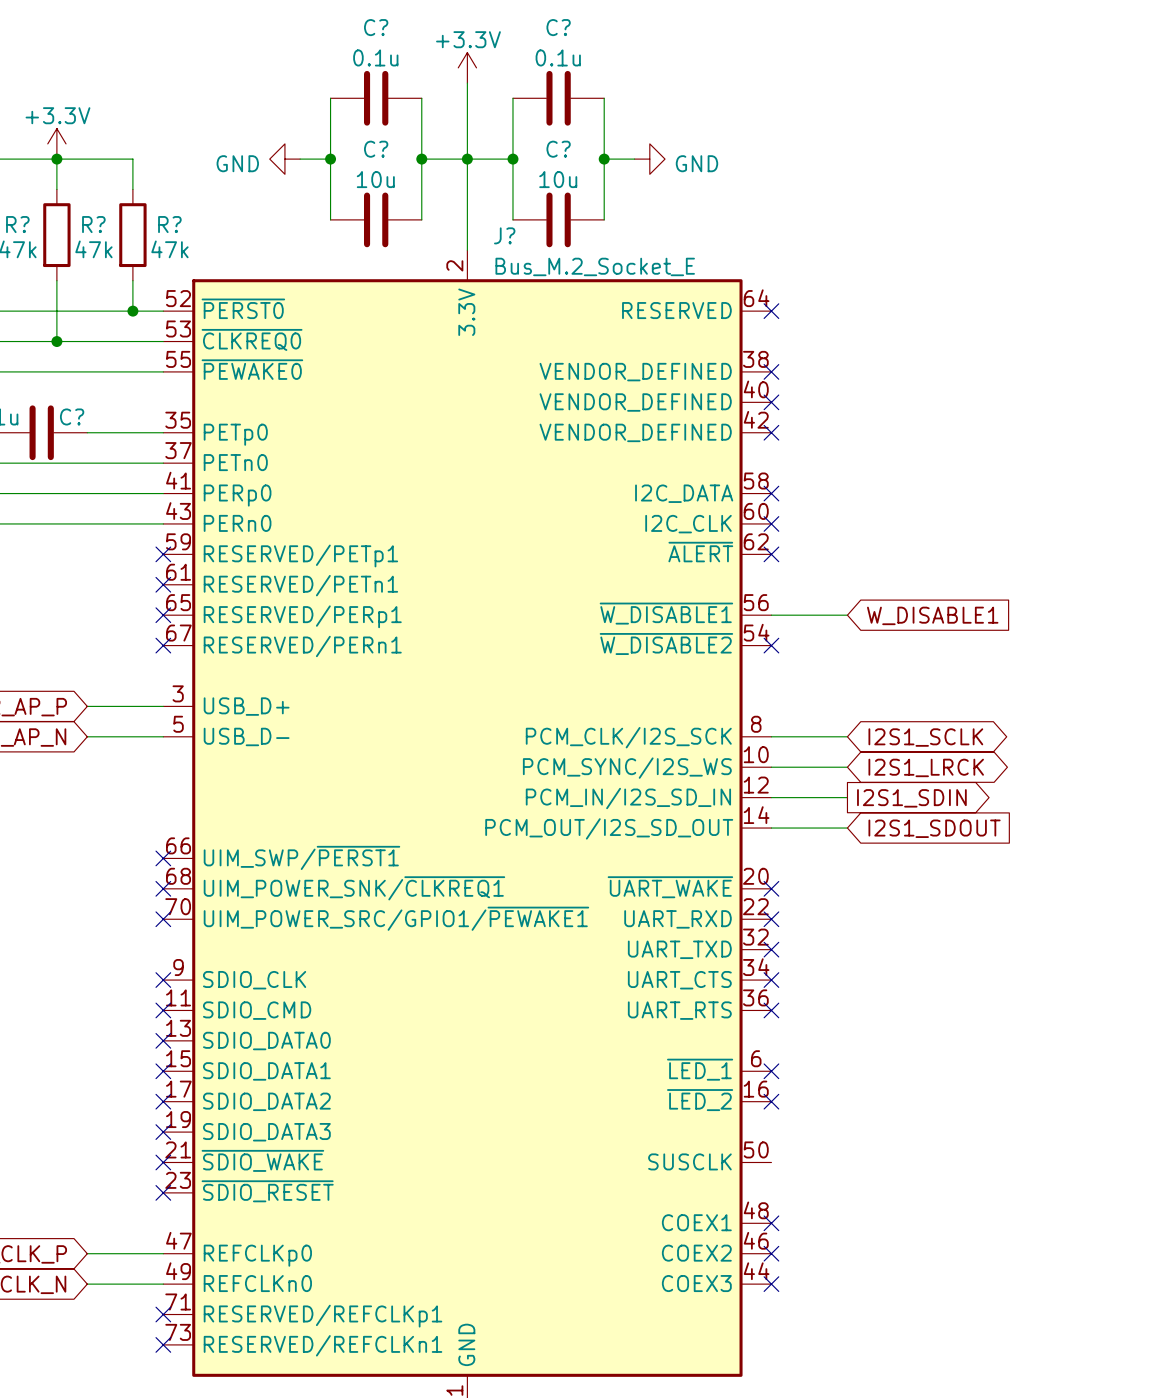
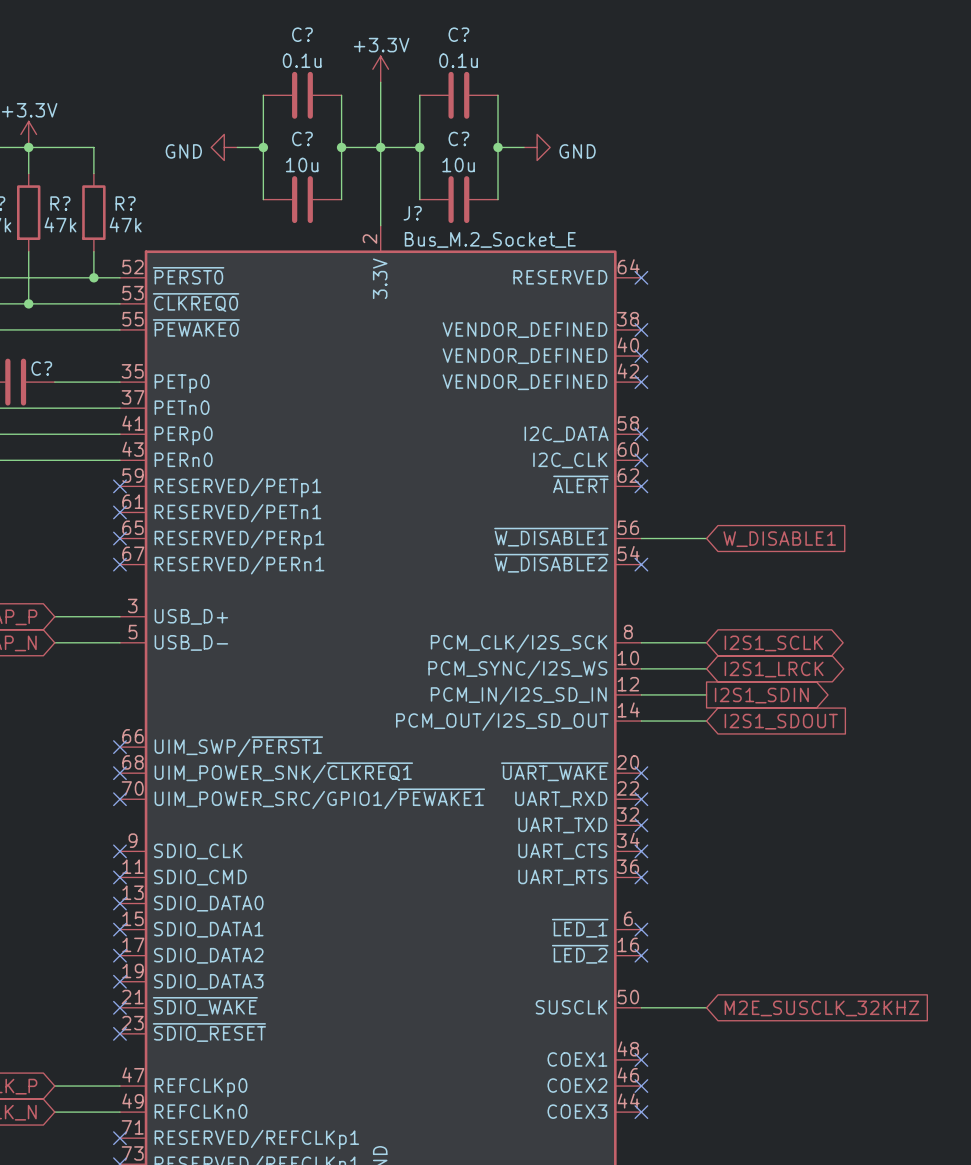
wire: none -> (641, 1007) (706, 1007)
global label: none -> M2E_SUSCLK_32KHZ (821, 1008)

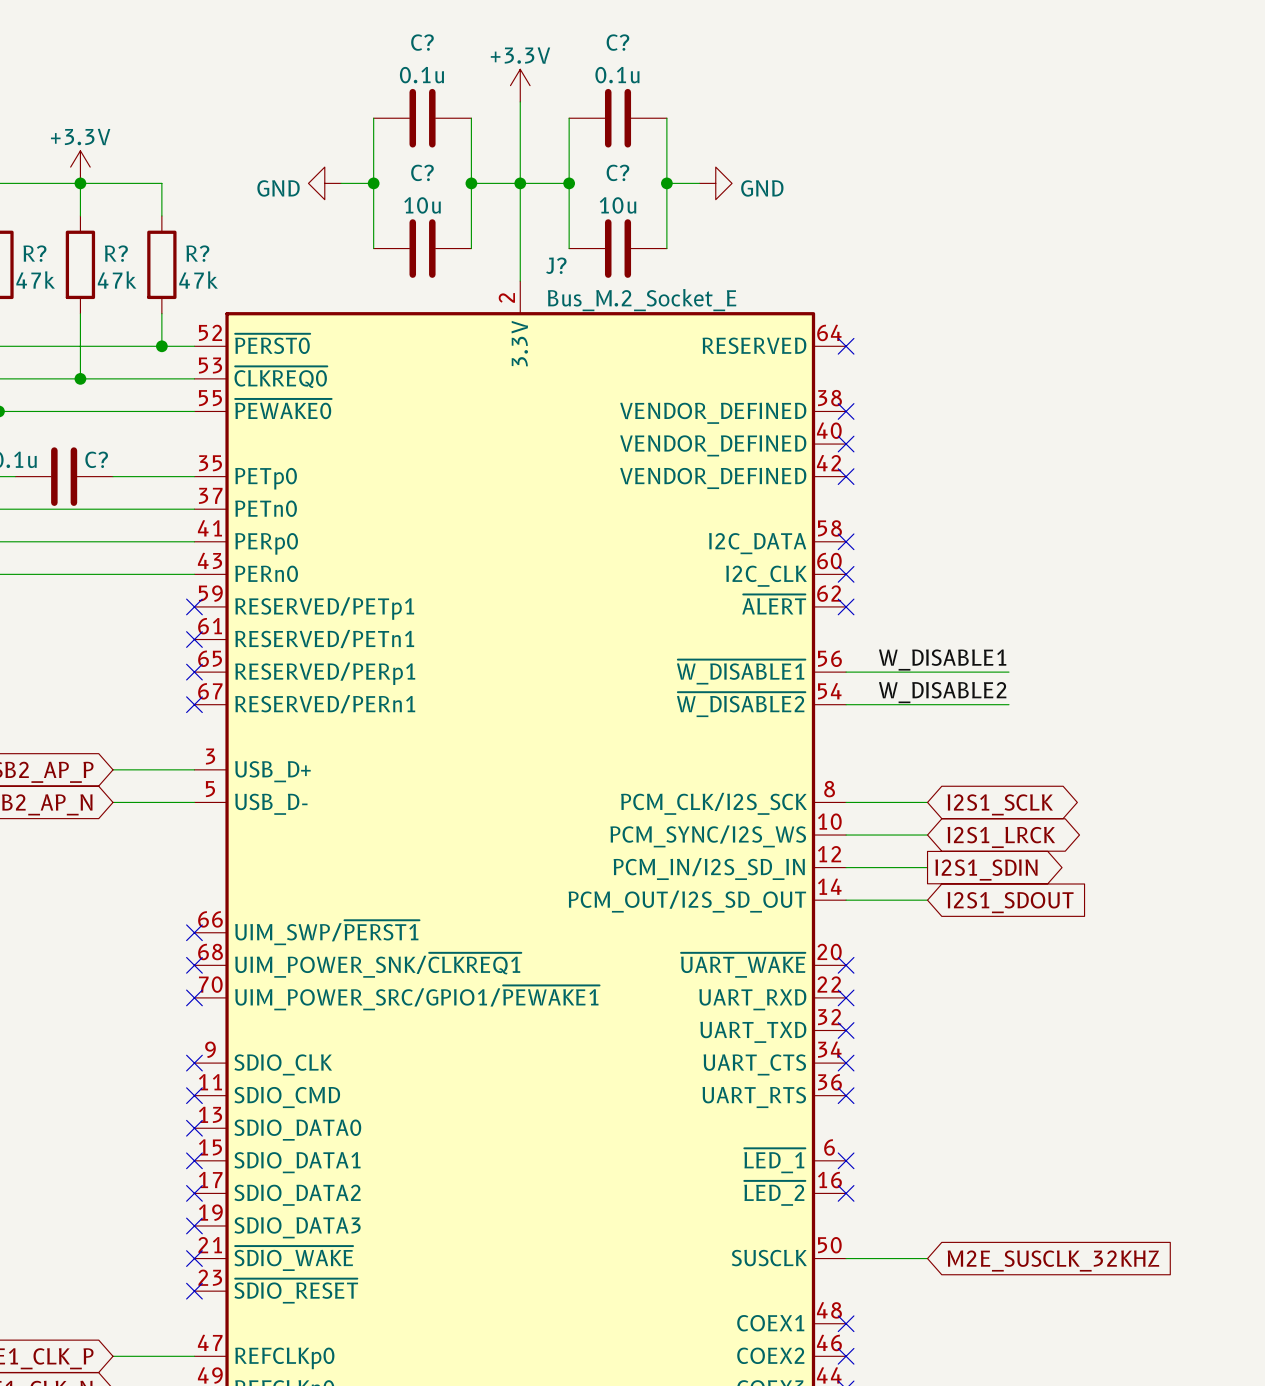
label: none -> W_DISABLE1 (942, 660)
wire: none -> (927, 672) (1008, 672)
global label: W_DISABLE1 (779, 539) -> none
label: none -> W_DISABLE2 (942, 692)
wire: none -> (846, 704) (1008, 704)
no-connect mark: (641, 564) -> none

